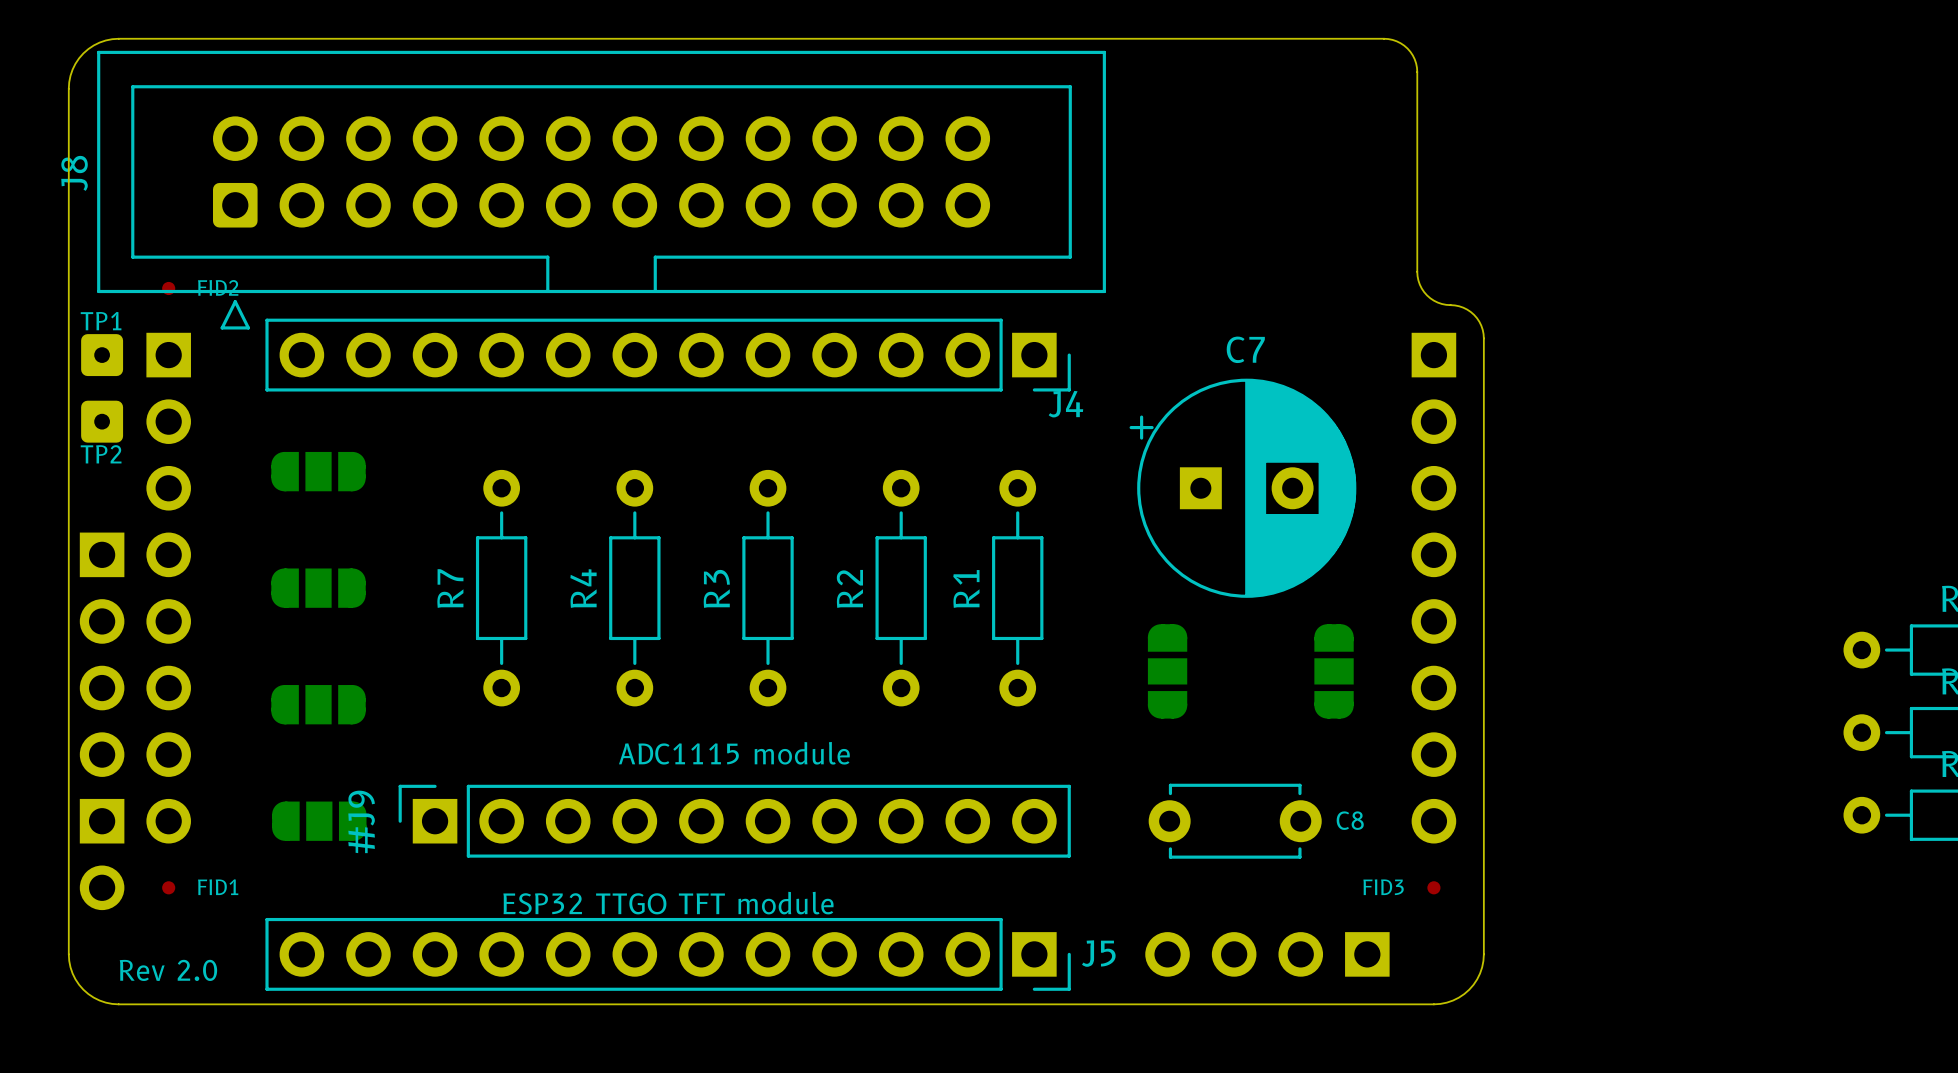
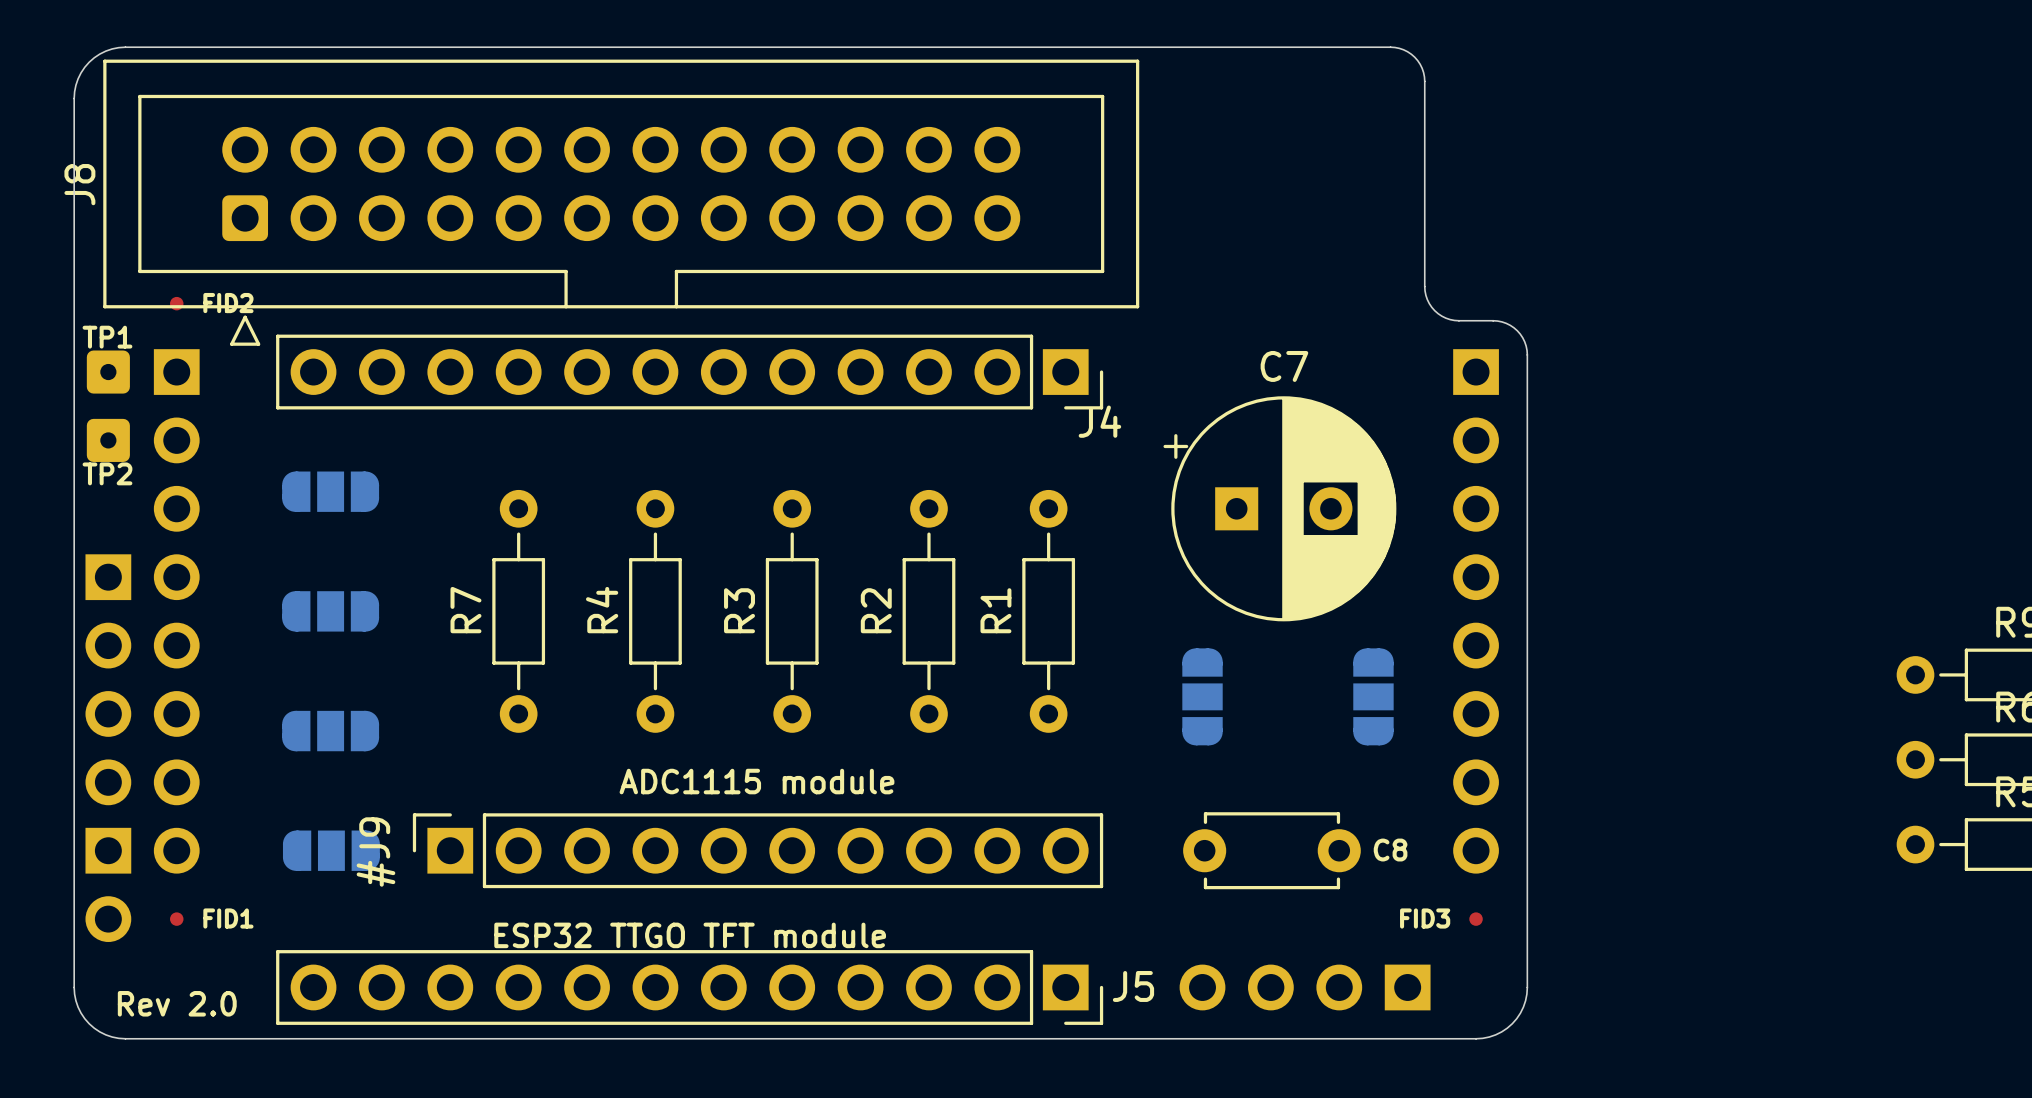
board edge: (1350, 38) (1392, 39) (1404, 45) (1414, 59) (1417, 72) (1417, 276) (1421, 288) (1430, 298) (1441, 304) (1450, 305) -> (1390, 47) (1399, 48) (1411, 54) (1420, 64) (1424, 76) (1424, 286) (1427, 299) (1438, 313) (1450, 319) (1493, 320)

